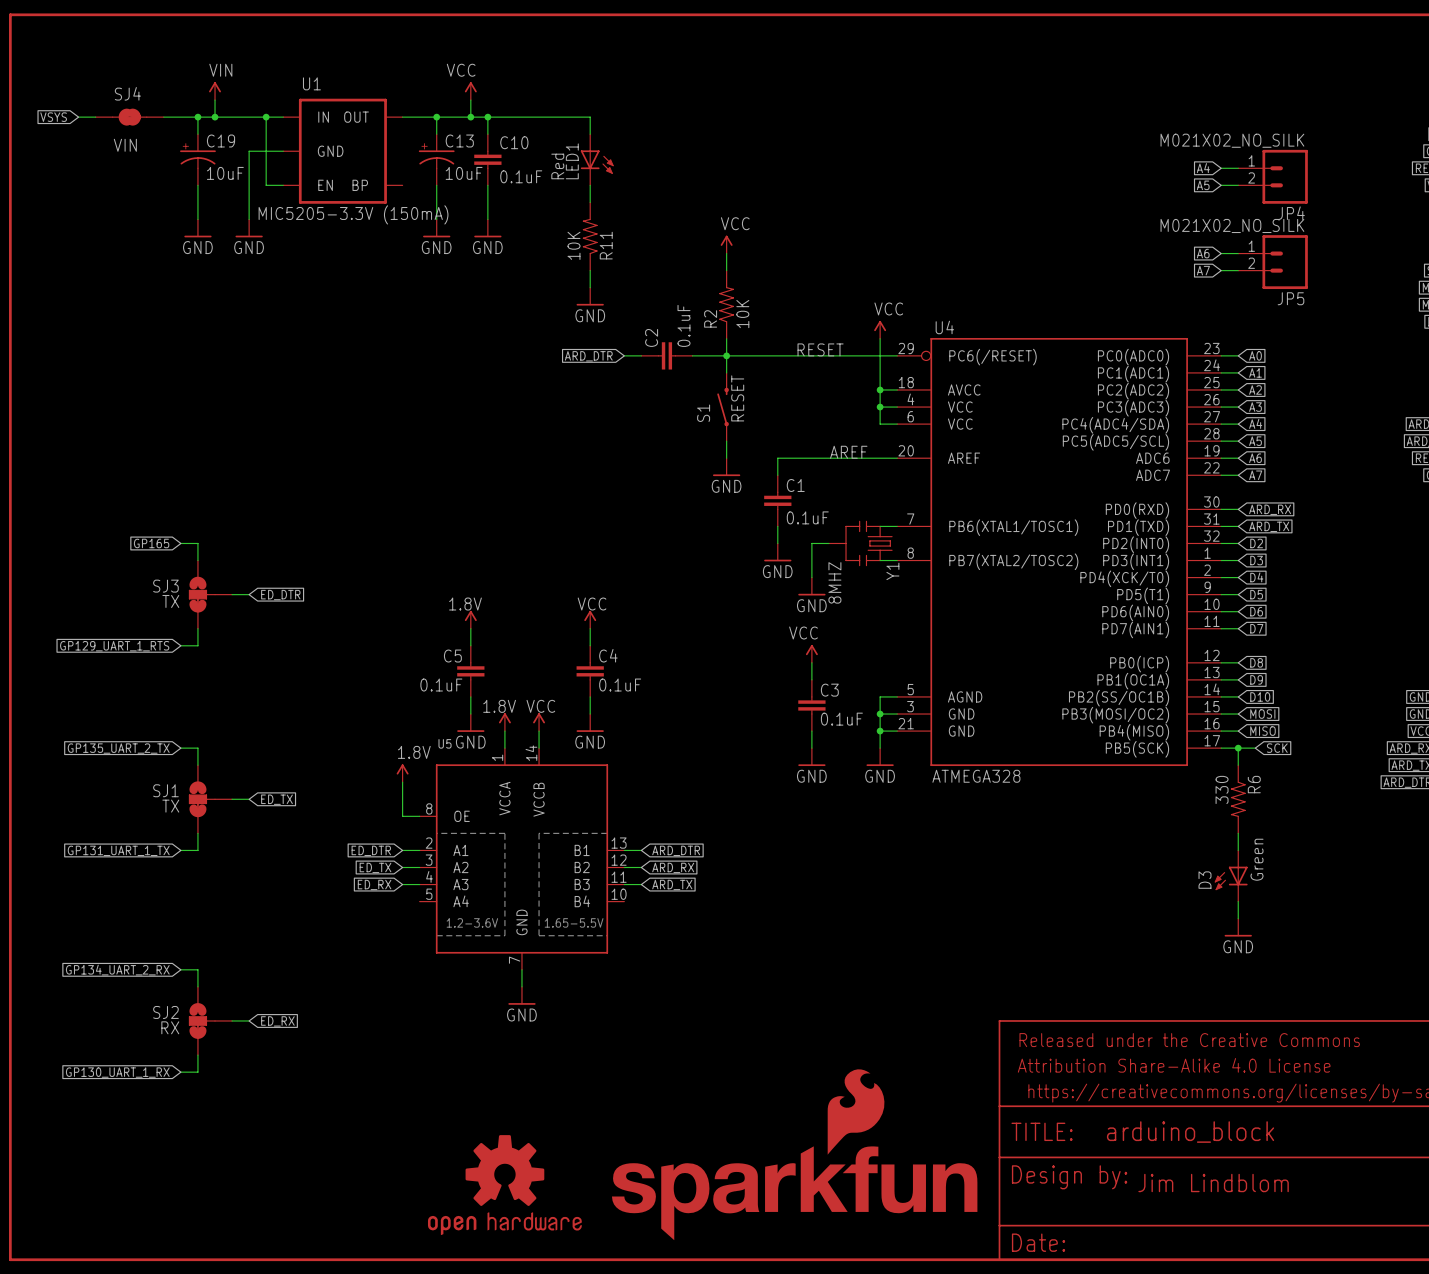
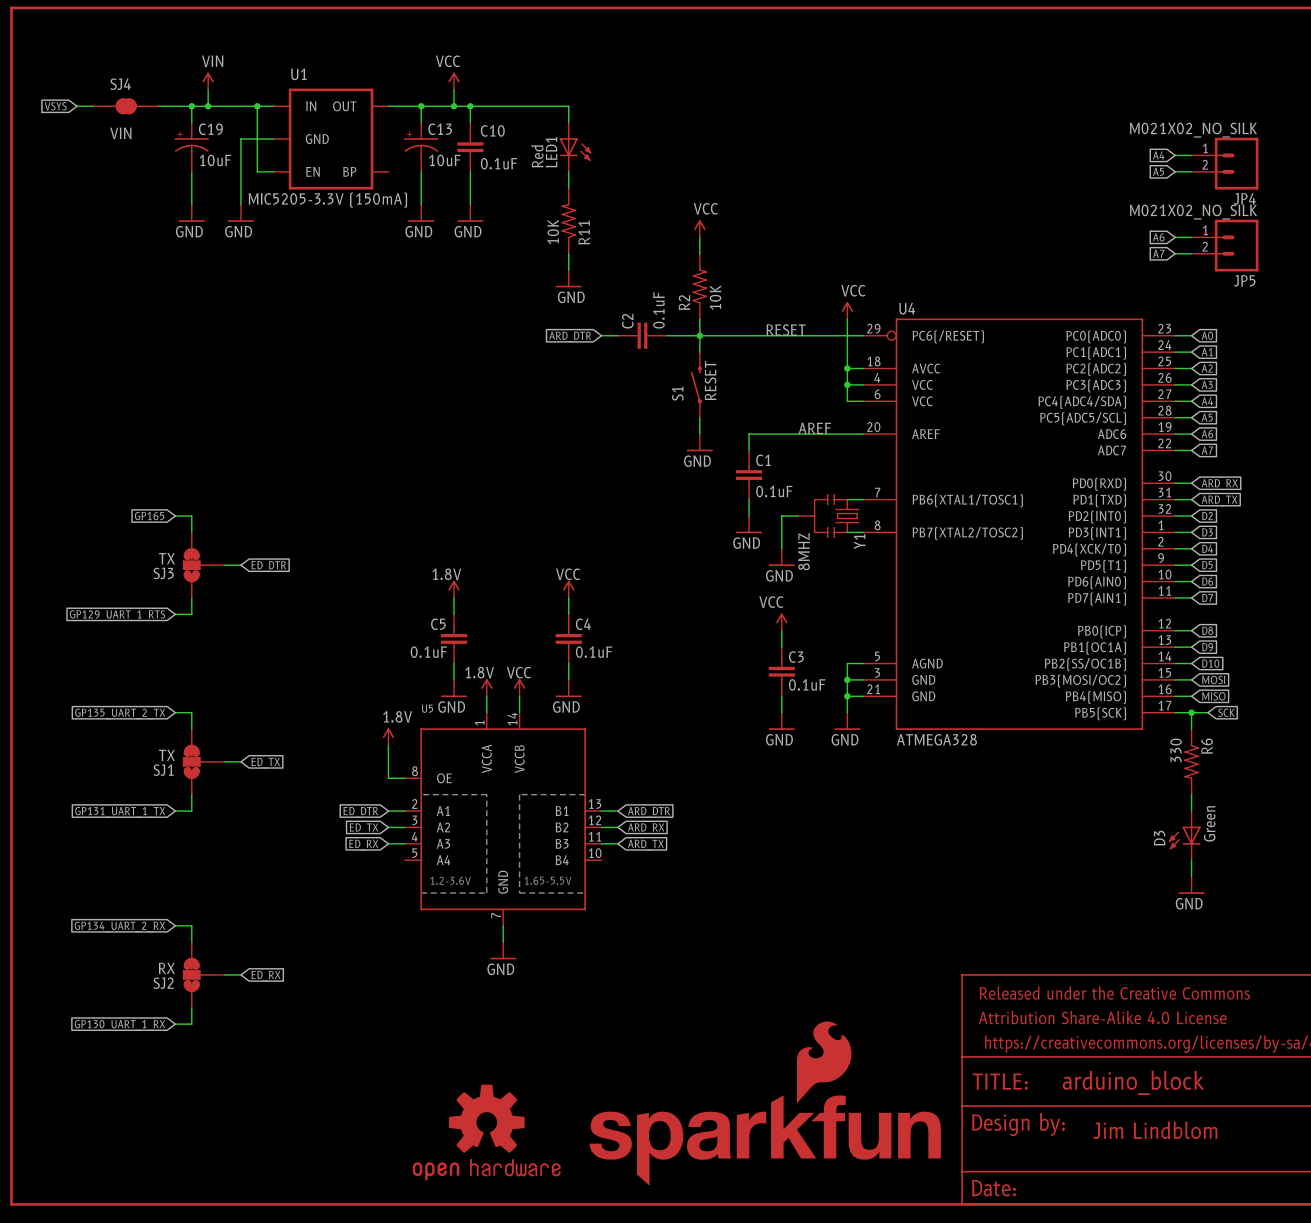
SJ3 flip: as is (202, 594) -> up-down (195, 565)
SJ1 flip: as is (202, 799) -> up-down (195, 761)
SJ2 flip: as is (202, 1020) -> up-down (195, 974)

